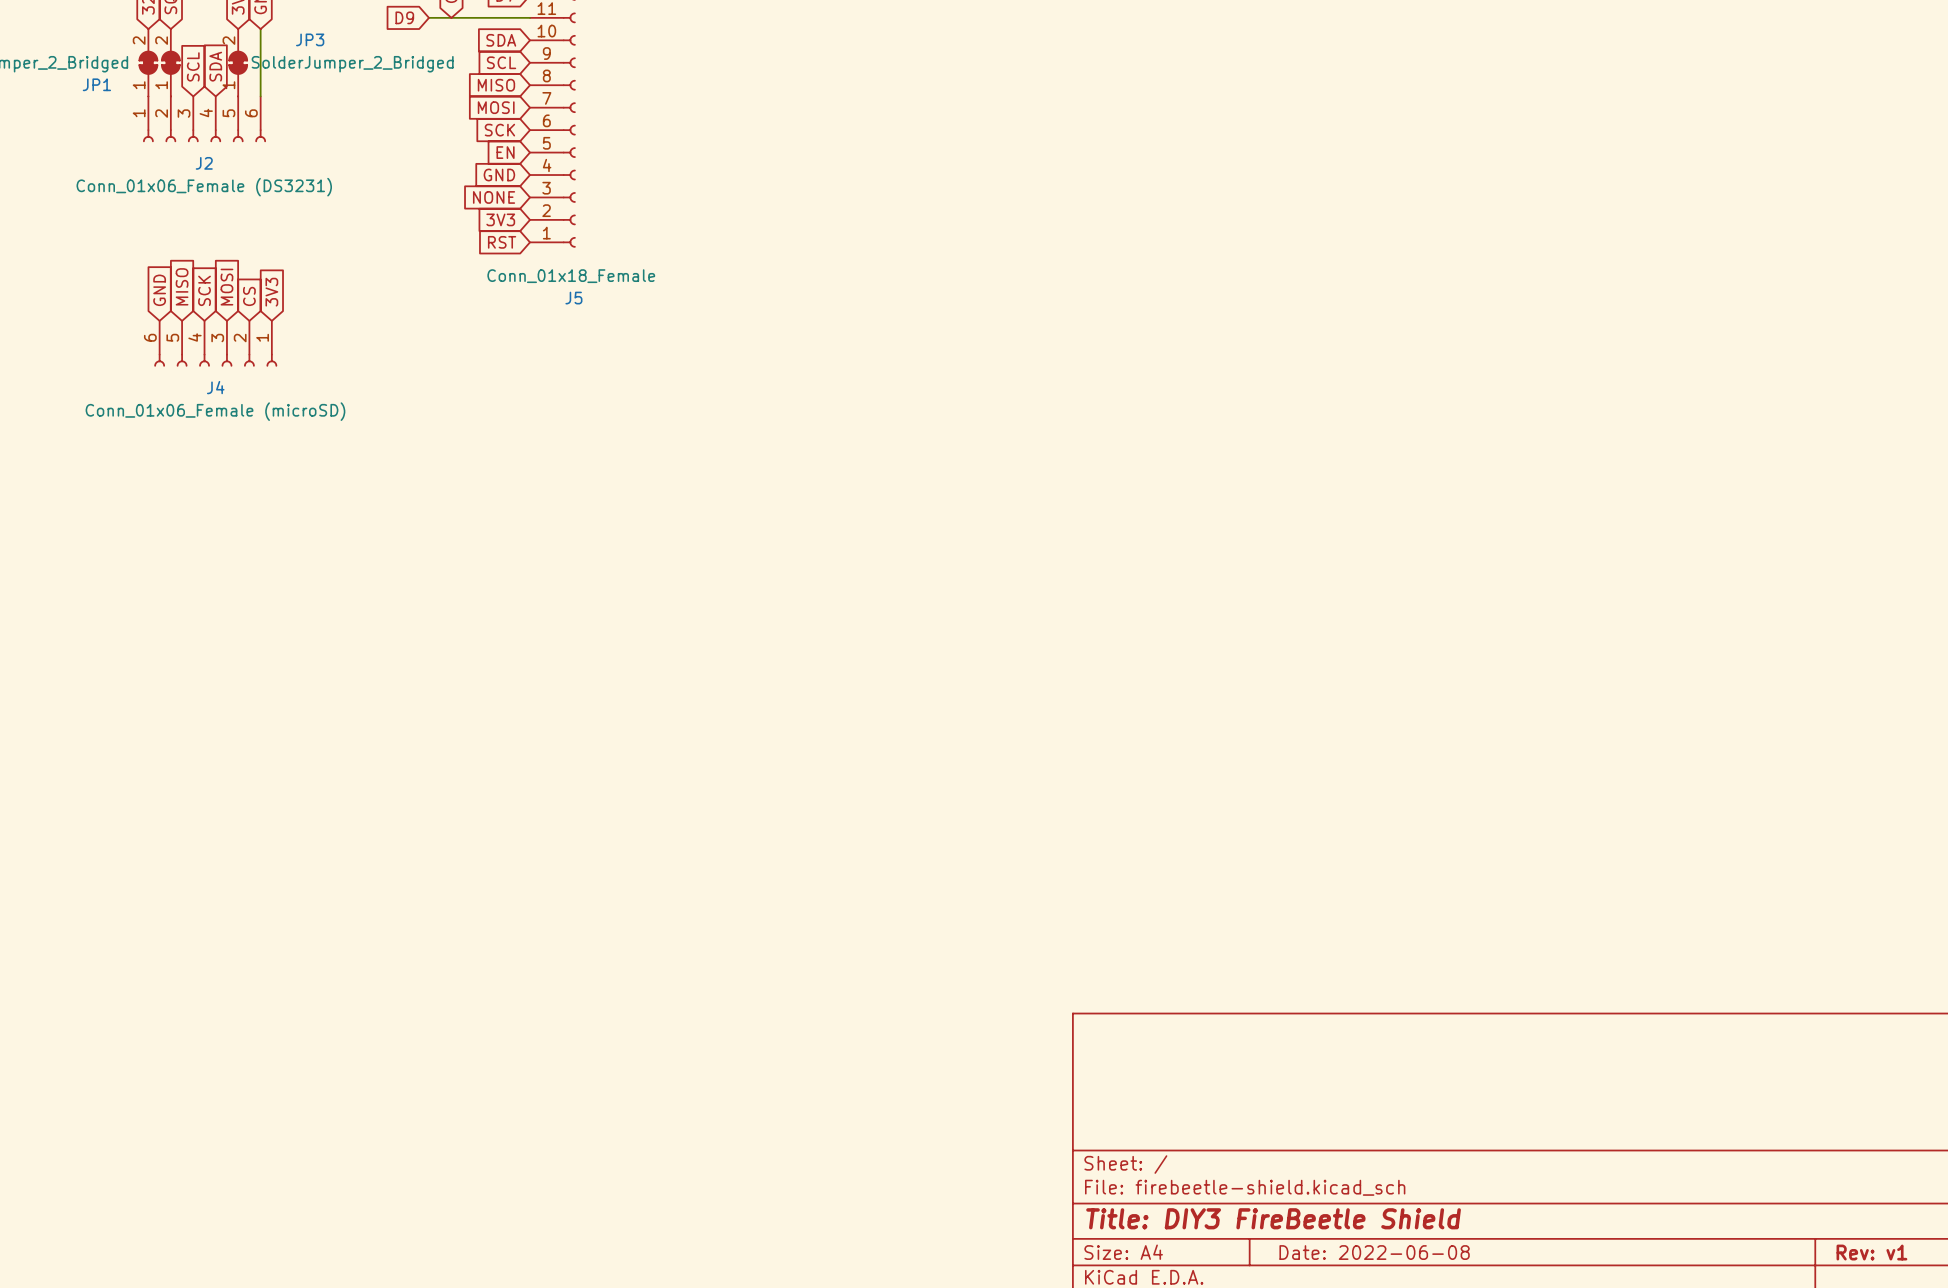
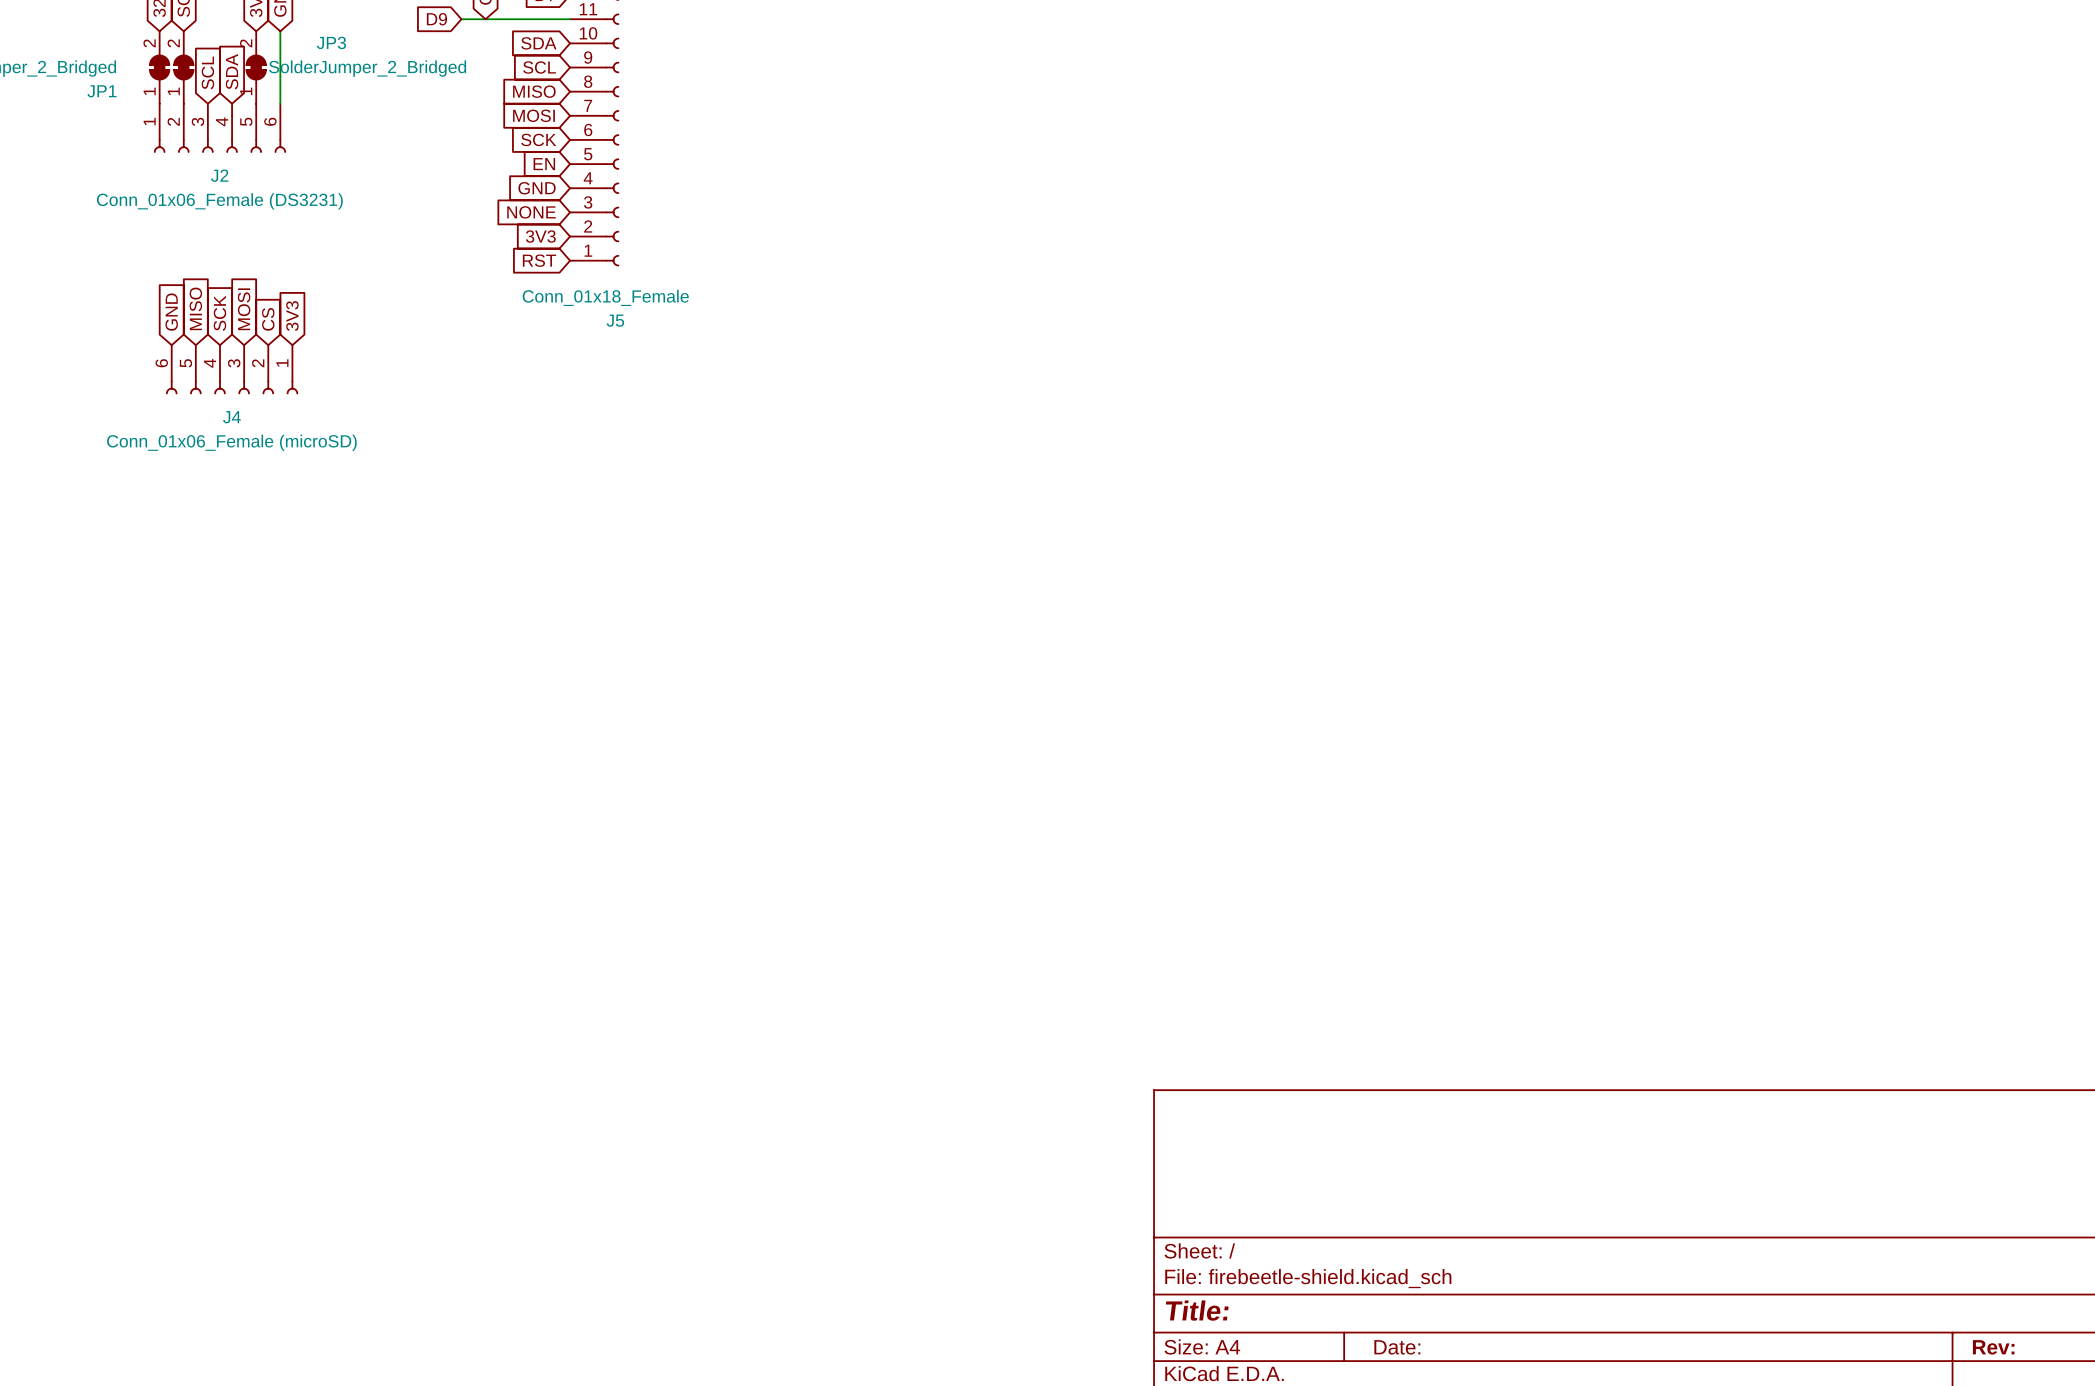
title block: Title: DIY3 FireBeetle Shield (1273, 1218) -> Title: (1197, 1310)
title block: Date: 2022-06-08 (1374, 1252) -> Date: (1397, 1347)
title block: Rev: v1 (1871, 1252) -> Rev: (1993, 1347)

